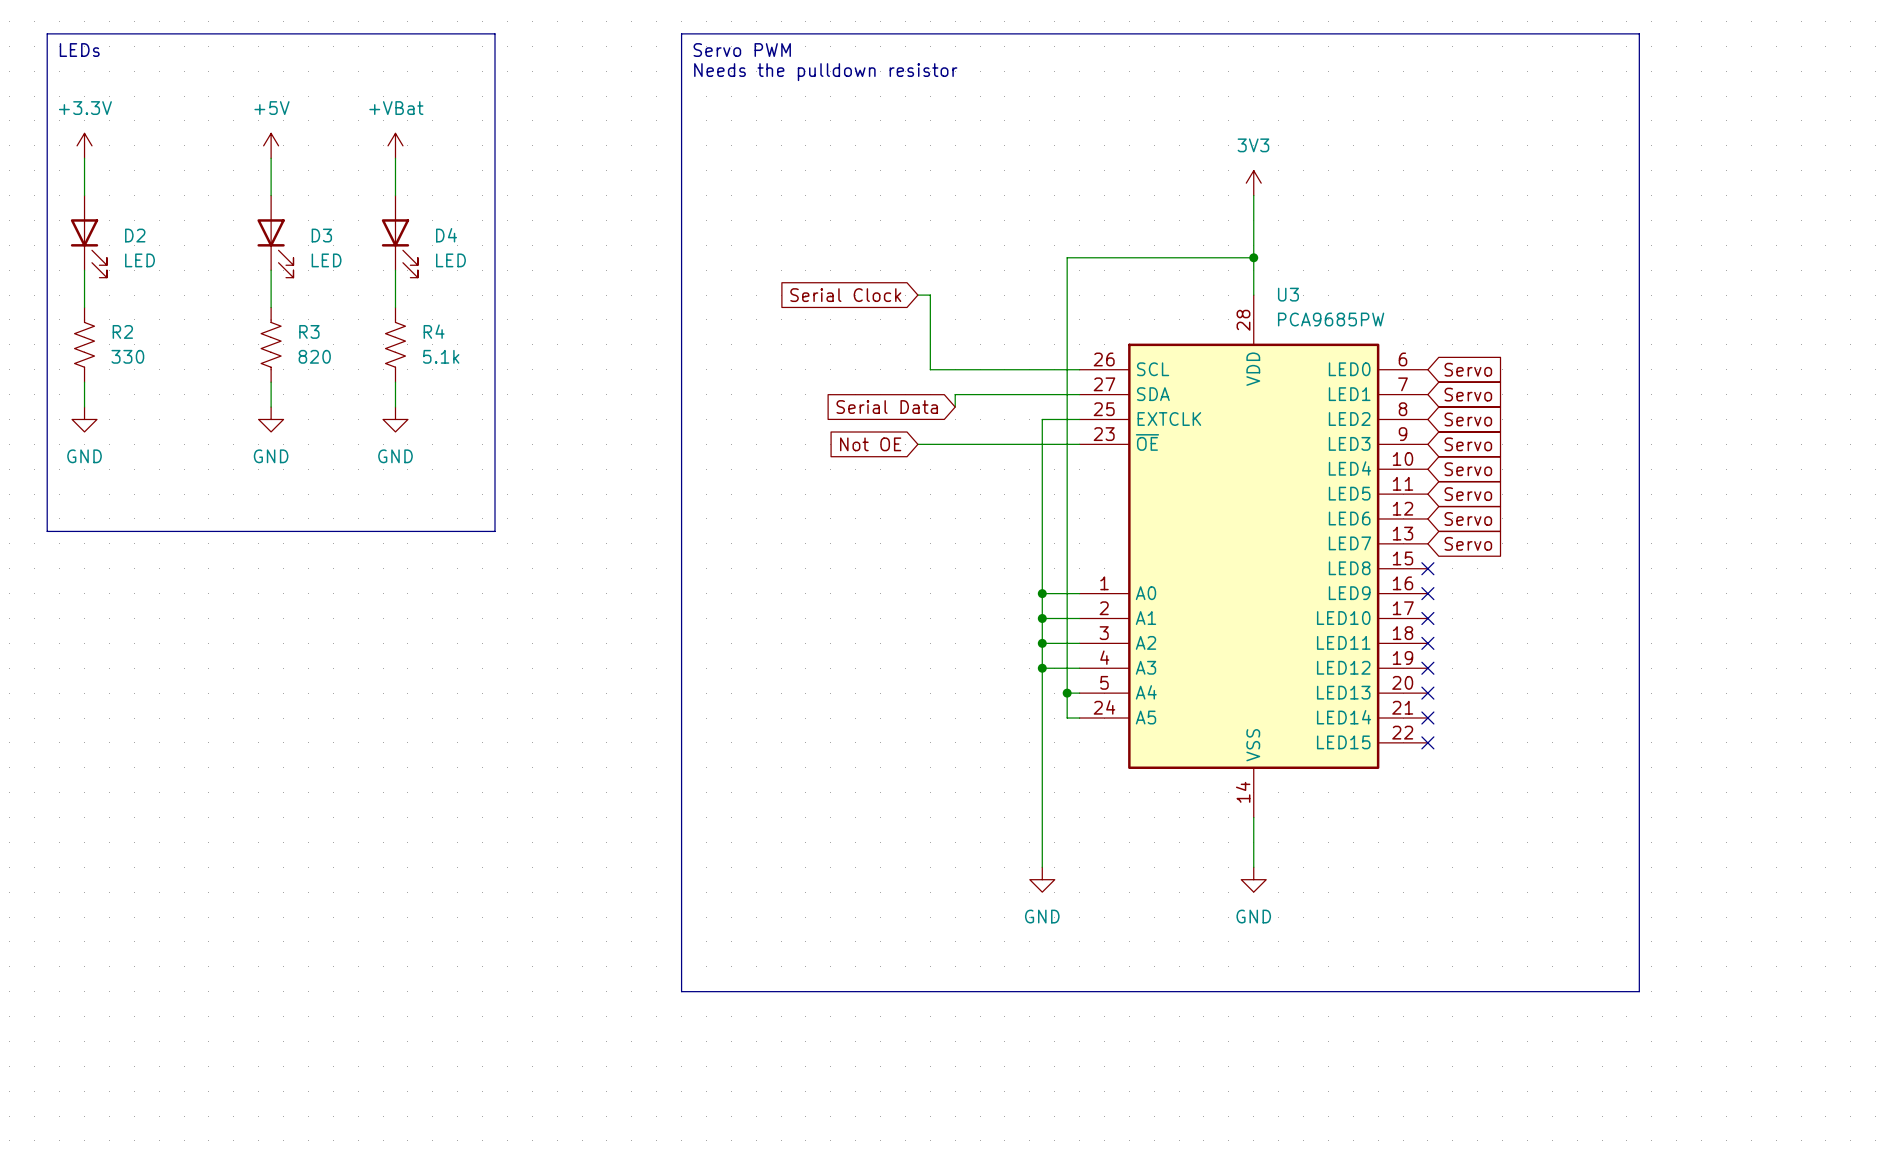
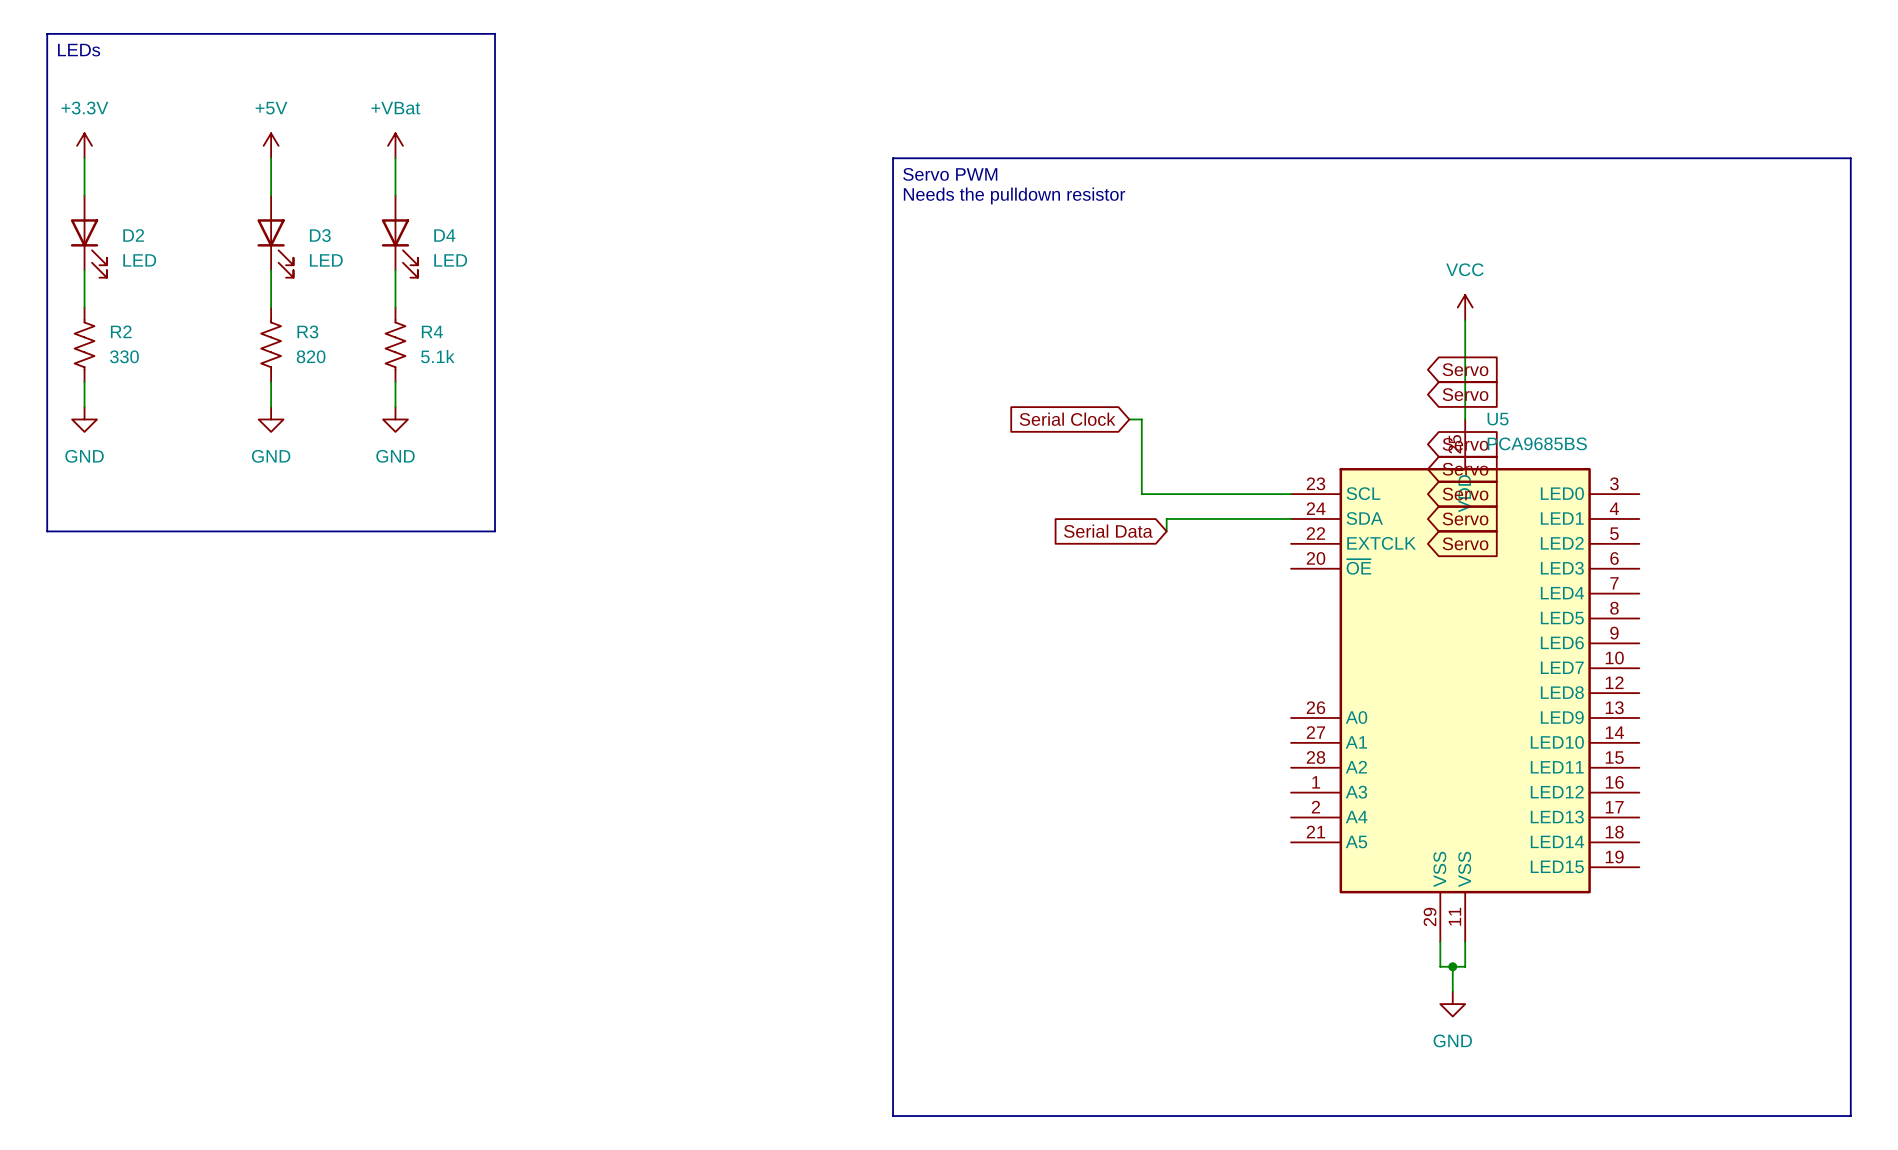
line: (681, 33) (1639, 33) (1639, 991) (681, 991) (681, 33) -> (893, 158) (1850, 158) (1850, 1116) (893, 1116) (893, 158)
text: Servo PWM (742, 50) -> none
text: Needs the pulldown resistor (825, 72) -> none
text: none -> Servo PWM (950, 174)
power symbol: 3V3 (1253, 183) -> none
wire: (1253, 195) (1253, 295) -> none
text: none -> Needs the pulldown resistor (1014, 195)
wire: (1253, 257) (1067, 257) (1067, 718) (1079, 718) -> none
junction: (1253, 257) -> none
global label: Serial Clock (845, 295) -> none
wire: (917, 295) (930, 295) (930, 369) (1079, 369) -> none
power symbol: none -> VCC (1465, 307)
wire: none -> (1465, 319) (1465, 419)
wire: (1079, 394) (955, 394) (955, 407) -> none
global label: Serial Data (887, 407) -> none
global label: none -> Serial Clock (1067, 419)
wire: (1079, 419) (1042, 419) (1042, 867) -> none
global label: Servo (1468, 419) -> none
global label: Not OE (870, 444) -> none
wire: (917, 444) (1079, 444) -> none
global label: none -> Serial Data (1108, 531)
U3: PCA9685PW (1253, 556) -> none
no-connect mark: (1427, 568) -> none
wire: (1042, 593) (1079, 593) -> none
junction: (1042, 593) -> none
no-connect mark: (1427, 593) -> none
wire: (1042, 618) (1079, 618) -> none
junction: (1042, 618) -> none
no-connect mark: (1427, 618) -> none
wire: (1042, 643) (1079, 643) -> none
junction: (1042, 643) -> none
no-connect mark: (1427, 643) -> none
wire: (1042, 668) (1079, 668) -> none
junction: (1042, 668) -> none
no-connect mark: (1427, 668) -> none
U5: none -> PCA9685BS (1465, 680)
wire: (1067, 693) (1079, 693) -> none
junction: (1067, 693) -> none
no-connect mark: (1427, 693) -> none
no-connect mark: (1427, 718) -> none
no-connect mark: (1427, 742) -> none
wire: (1253, 817) (1253, 867) -> none
power symbol: GND (1042, 879) -> none
power symbol: GND (1253, 879) -> none
wire: none -> (1440, 941) (1440, 966) (1465, 966) (1465, 941)
wire: none -> (1452, 966) (1452, 991)
junction: none -> (1452, 966)
power symbol: none -> GND (1452, 1004)

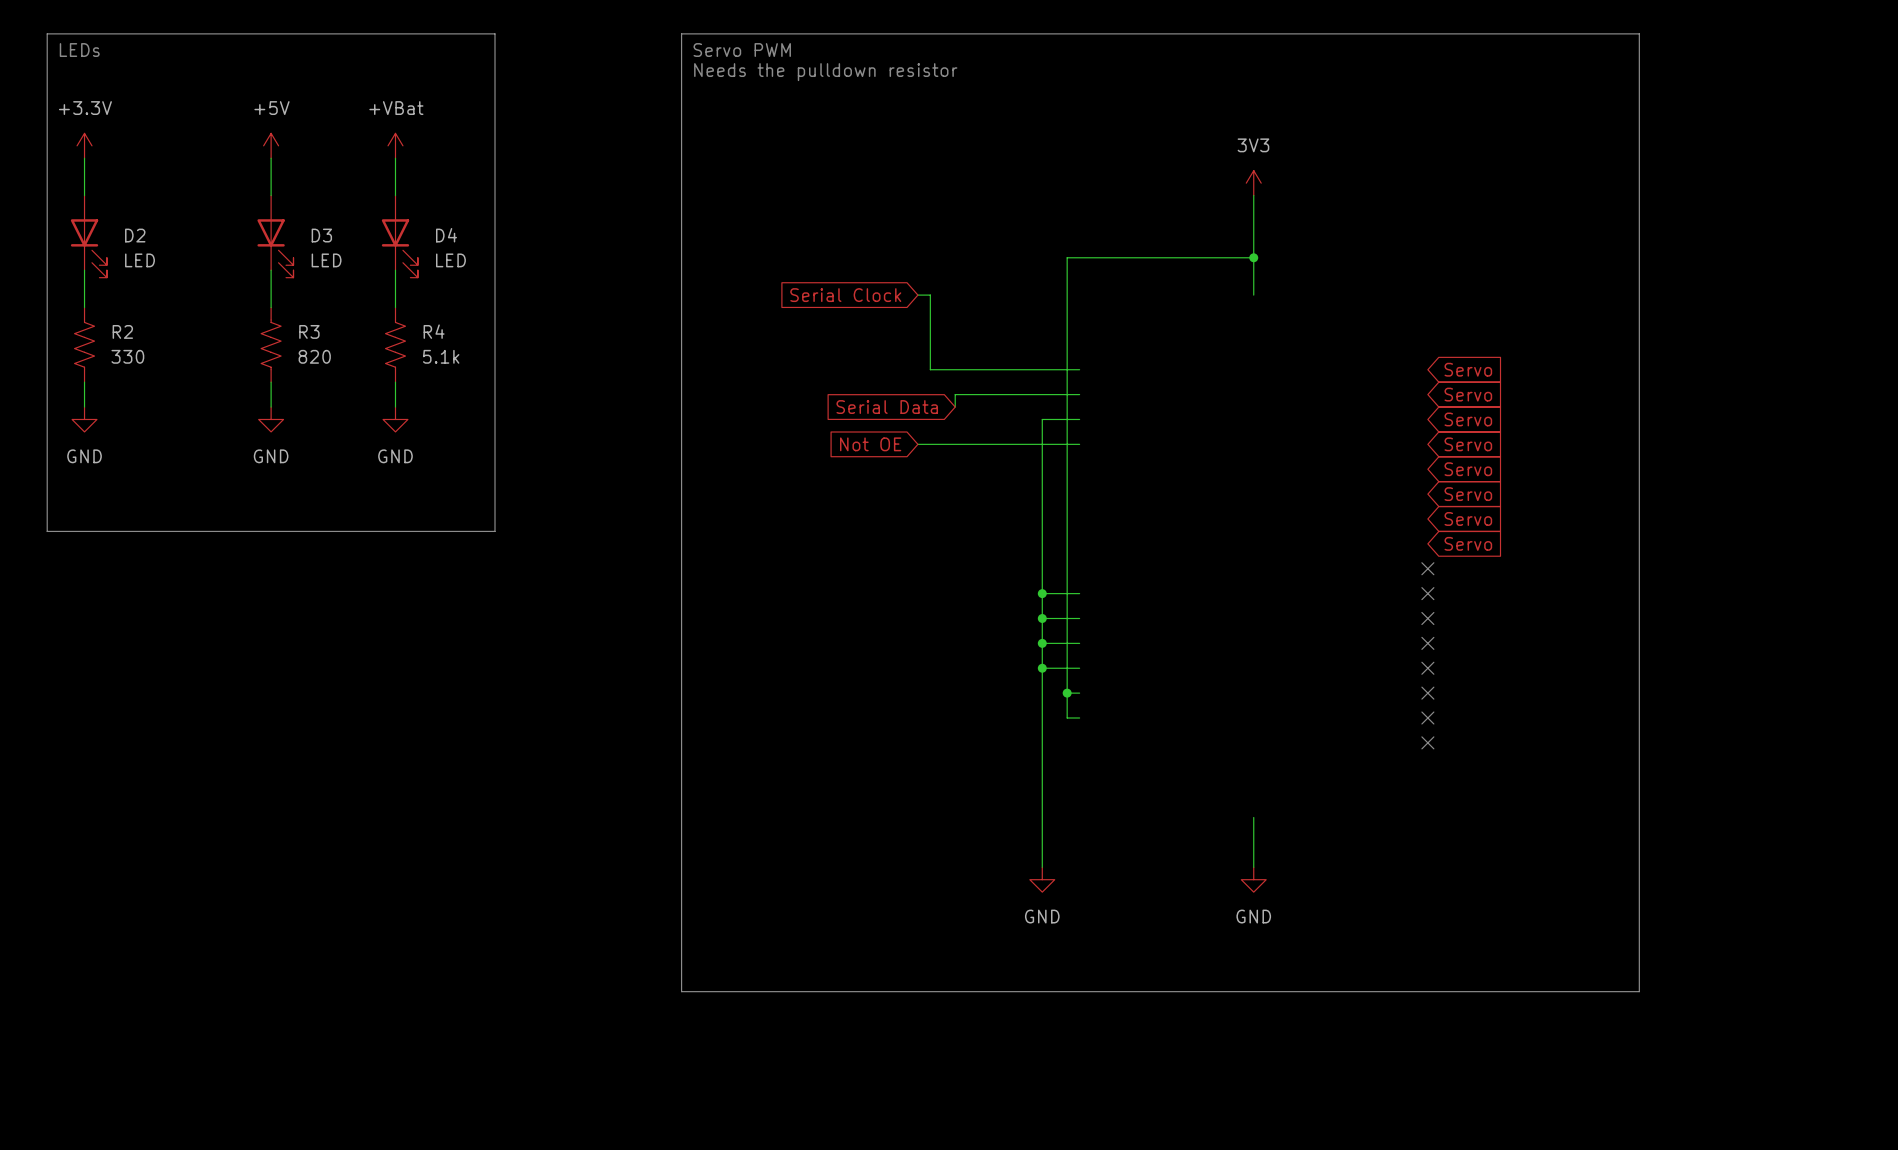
text: none -> Servo PWM (742, 50)
text: none -> Needs the pulldown resistor (825, 72)
line: (893, 158) (1850, 158) (1850, 1116) (893, 1116) (893, 158) -> (681, 33) (1639, 33) (1639, 991) (681, 991) (681, 33)
text: Servo PWM (950, 174) -> none
power symbol: none -> 3V3 (1253, 183)
text: Needs the pulldown resistor (1014, 195) -> none
wire: none -> (1253, 195) (1253, 295)
wire: none -> (1253, 257) (1067, 257) (1067, 718) (1079, 718)
junction: none -> (1253, 257)
global label: none -> Serial Clock (845, 295)
wire: none -> (917, 295) (930, 295) (930, 369) (1079, 369)
power symbol: VCC (1465, 307) -> none
wire: (1465, 319) (1465, 419) -> none
wire: none -> (1079, 394) (955, 394) (955, 407)
global label: none -> Serial Data (887, 407)
global label: Serial Clock (1067, 419) -> none
wire: none -> (1079, 419) (1042, 419) (1042, 867)
wire: (1129, 419) (1141, 419) (1141, 494) (1291, 494) -> none
global label: none -> Servo (1468, 419)
global label: none -> Not OE (870, 444)
wire: none -> (917, 444) (1079, 444)
wire: (1291, 518) (1166, 518) (1166, 531) -> none
global label: Serial Data (1108, 531) -> none
no-connect mark: none -> (1427, 568)
wire: none -> (1042, 593) (1079, 593)
junction: none -> (1042, 593)
no-connect mark: none -> (1427, 593)
wire: none -> (1042, 618) (1079, 618)
junction: none -> (1042, 618)
no-connect mark: none -> (1427, 618)
wire: none -> (1042, 643) (1079, 643)
junction: none -> (1042, 643)
no-connect mark: none -> (1427, 643)
wire: none -> (1042, 668) (1079, 668)
junction: none -> (1042, 668)
no-connect mark: none -> (1427, 668)
U5: PCA9685BS (1465, 680) -> none
wire: none -> (1067, 693) (1079, 693)
junction: none -> (1067, 693)
no-connect mark: none -> (1427, 693)
no-connect mark: none -> (1427, 718)
no-connect mark: none -> (1427, 742)
wire: none -> (1253, 817) (1253, 867)
power symbol: none -> GND (1042, 879)
power symbol: none -> GND (1253, 879)
wire: (1440, 941) (1440, 966) (1465, 966) (1465, 941) -> none
wire: (1452, 966) (1452, 991) -> none
junction: (1452, 966) -> none
power symbol: GND (1452, 1004) -> none

